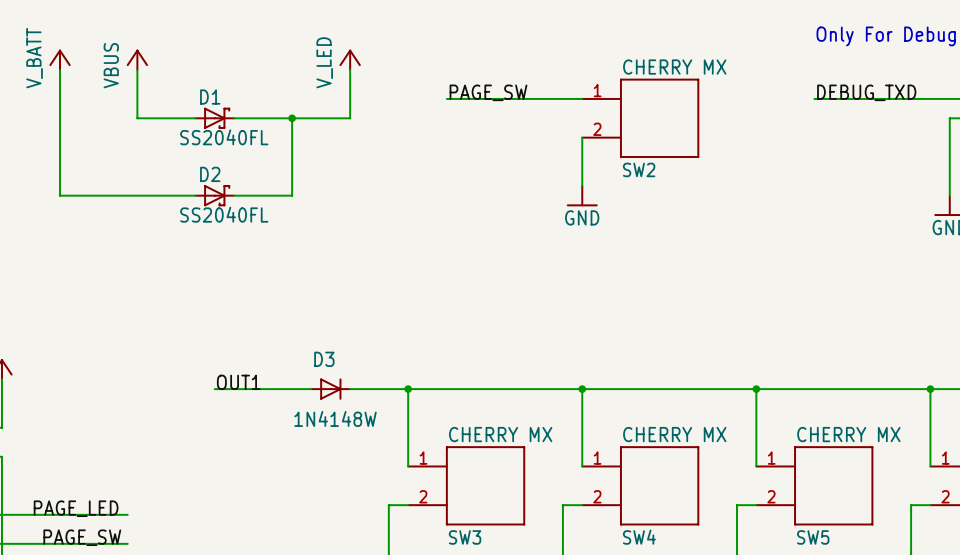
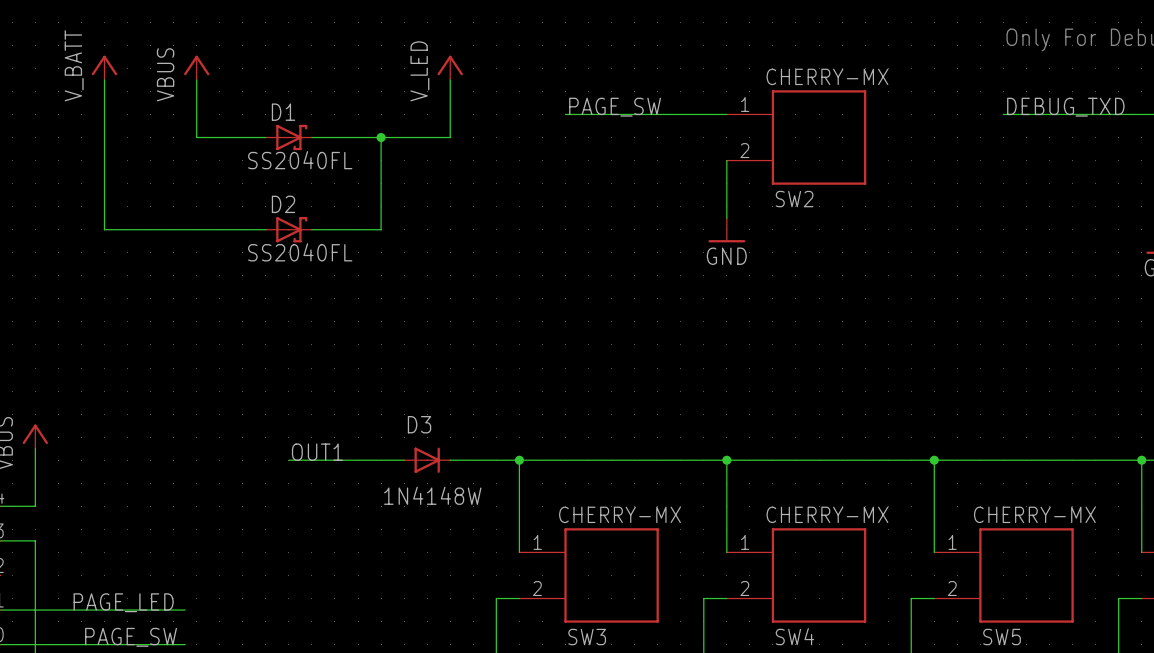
SW2 text: none -> CHERRY-MX (827, 76)
SW2 text: CHERRY MX (674, 67) -> none
SW3 text: none -> CHERRY-MX (619, 514)
SW3 text: CHERRY MX (500, 434) -> none
SW4 text: none -> CHERRY-MX (827, 514)
SW4 text: CHERRY MX (674, 434) -> none
SW5 text: none -> CHERRY-MX (1034, 514)
SW5 text: CHERRY MX (848, 434) -> none

